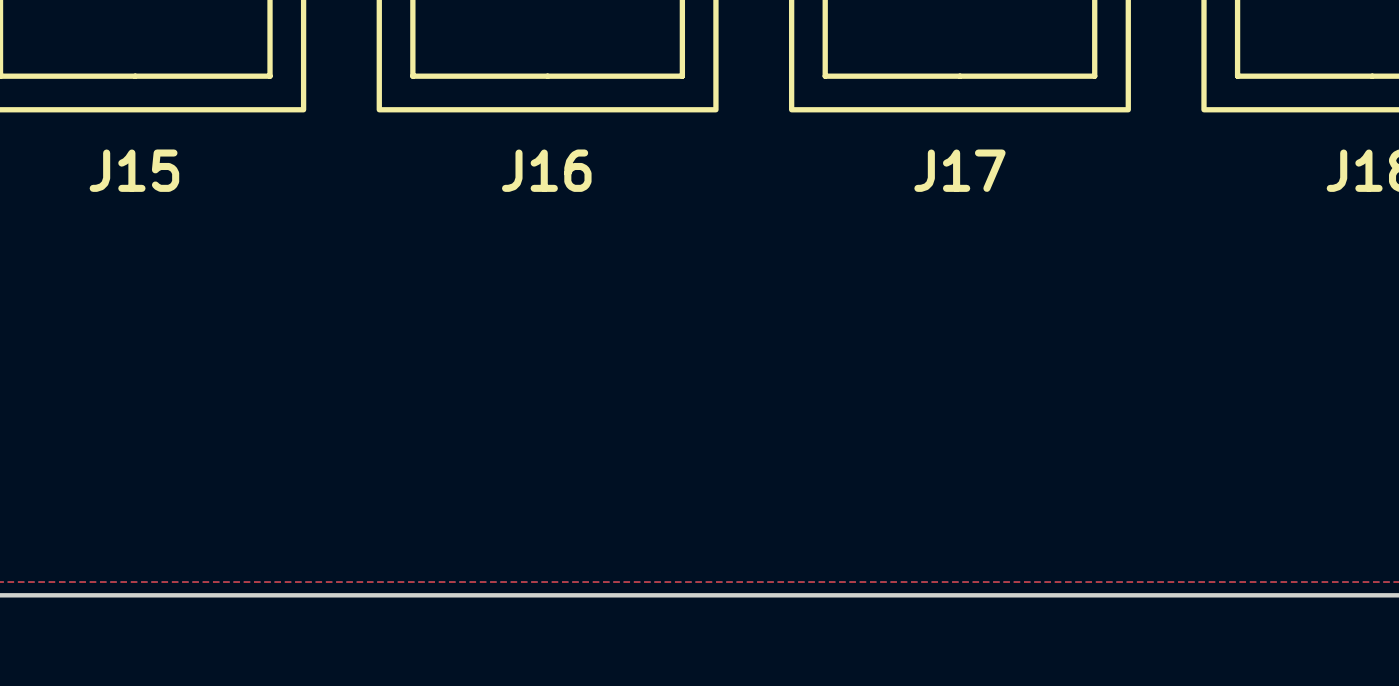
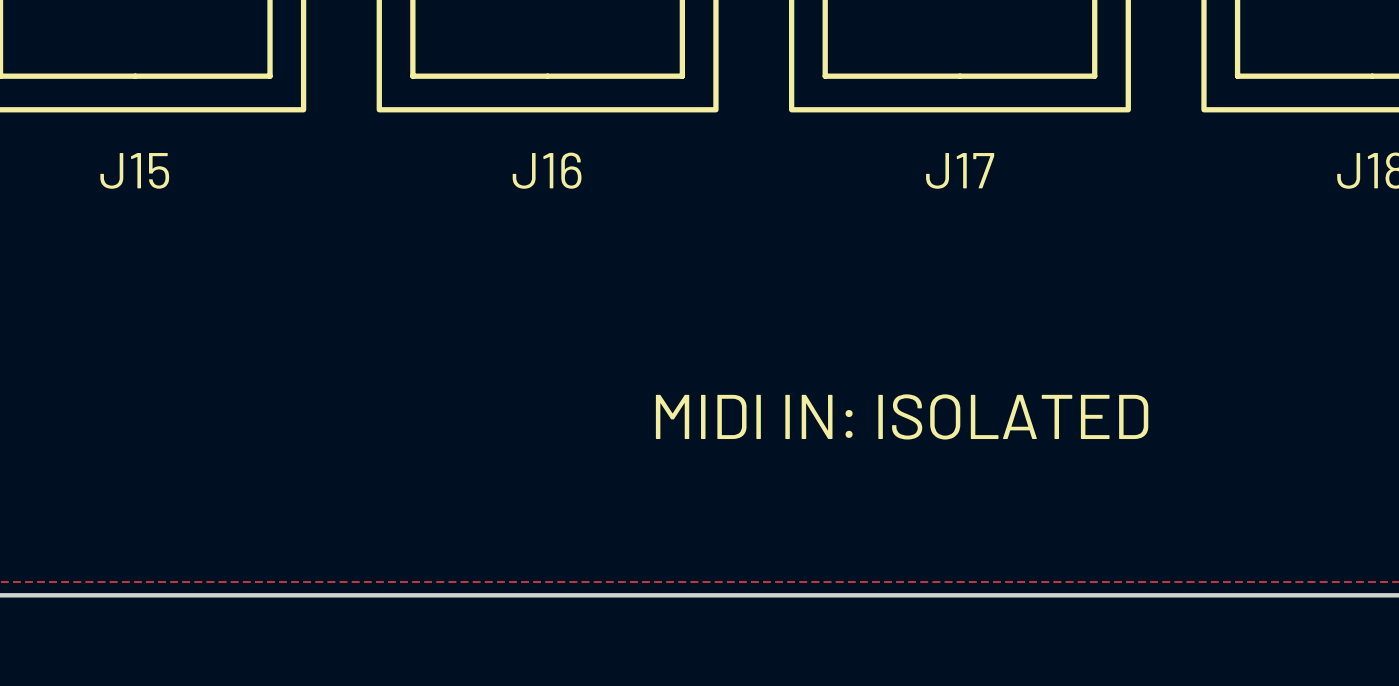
text: none -> MIDI IN: ISOLATED (902, 416)

